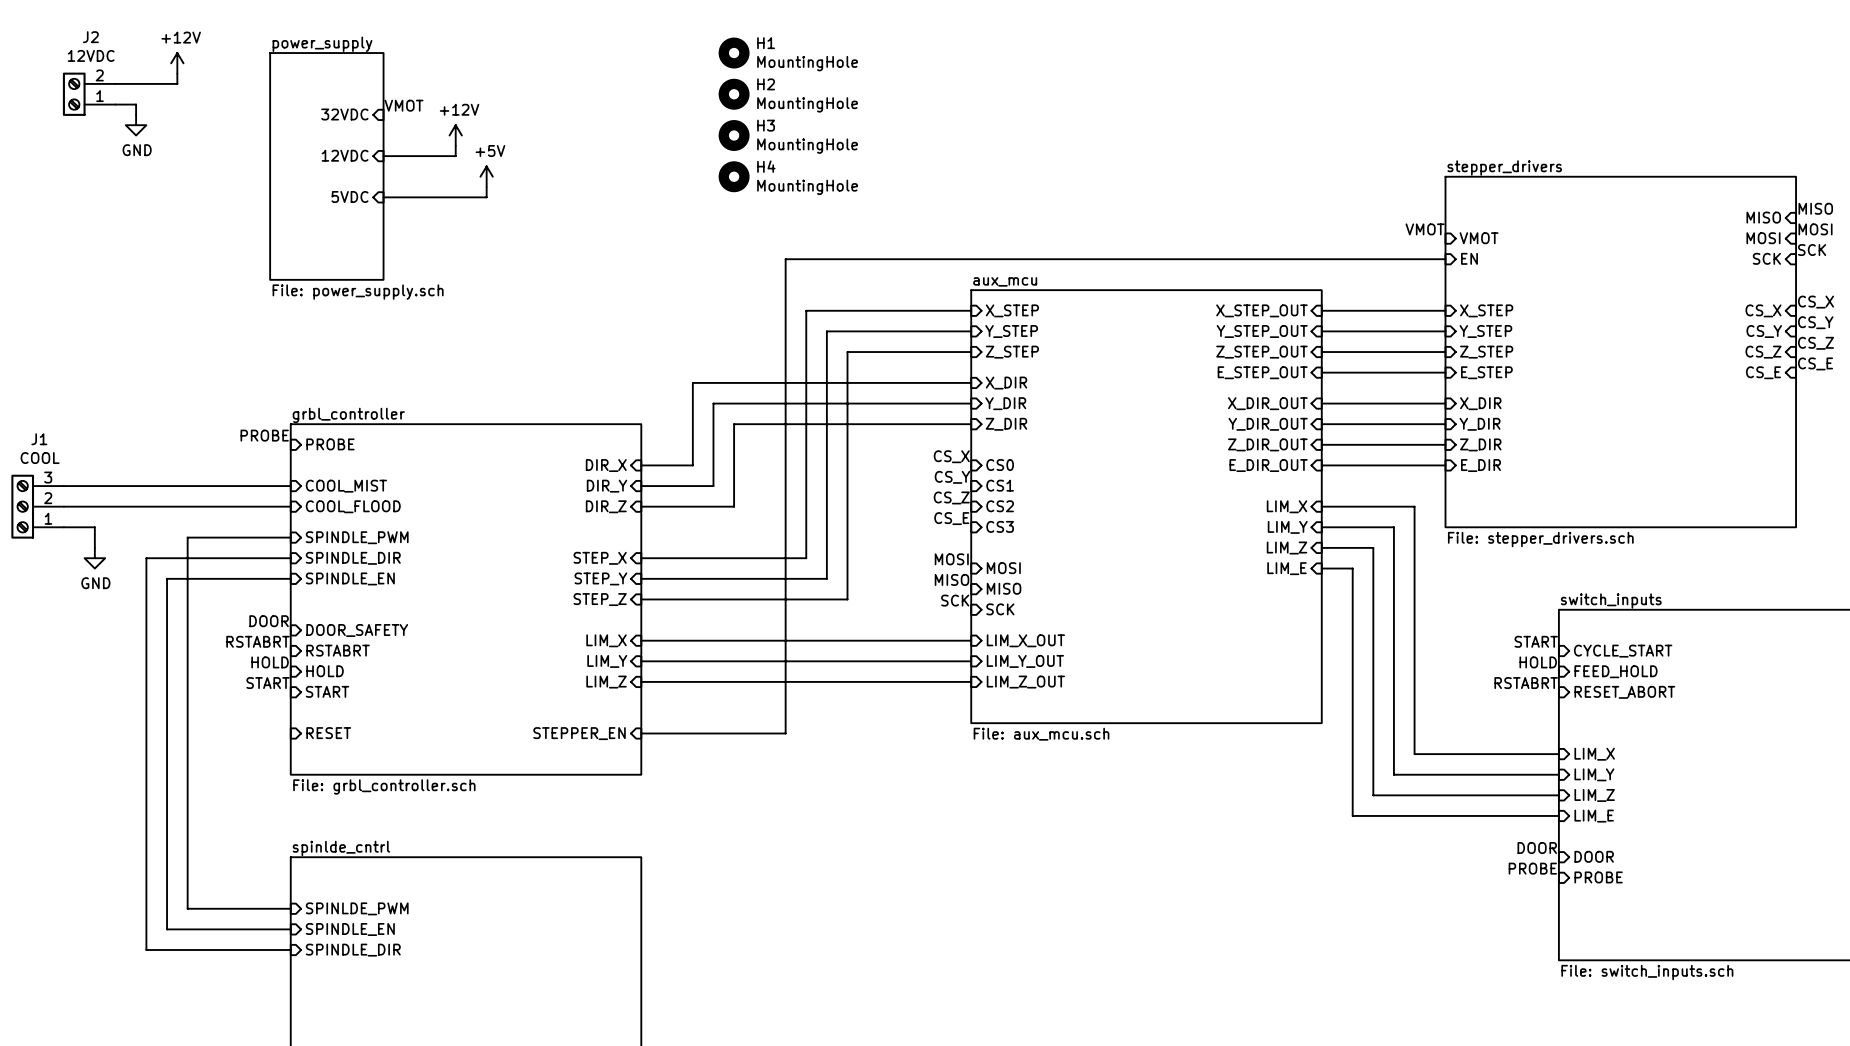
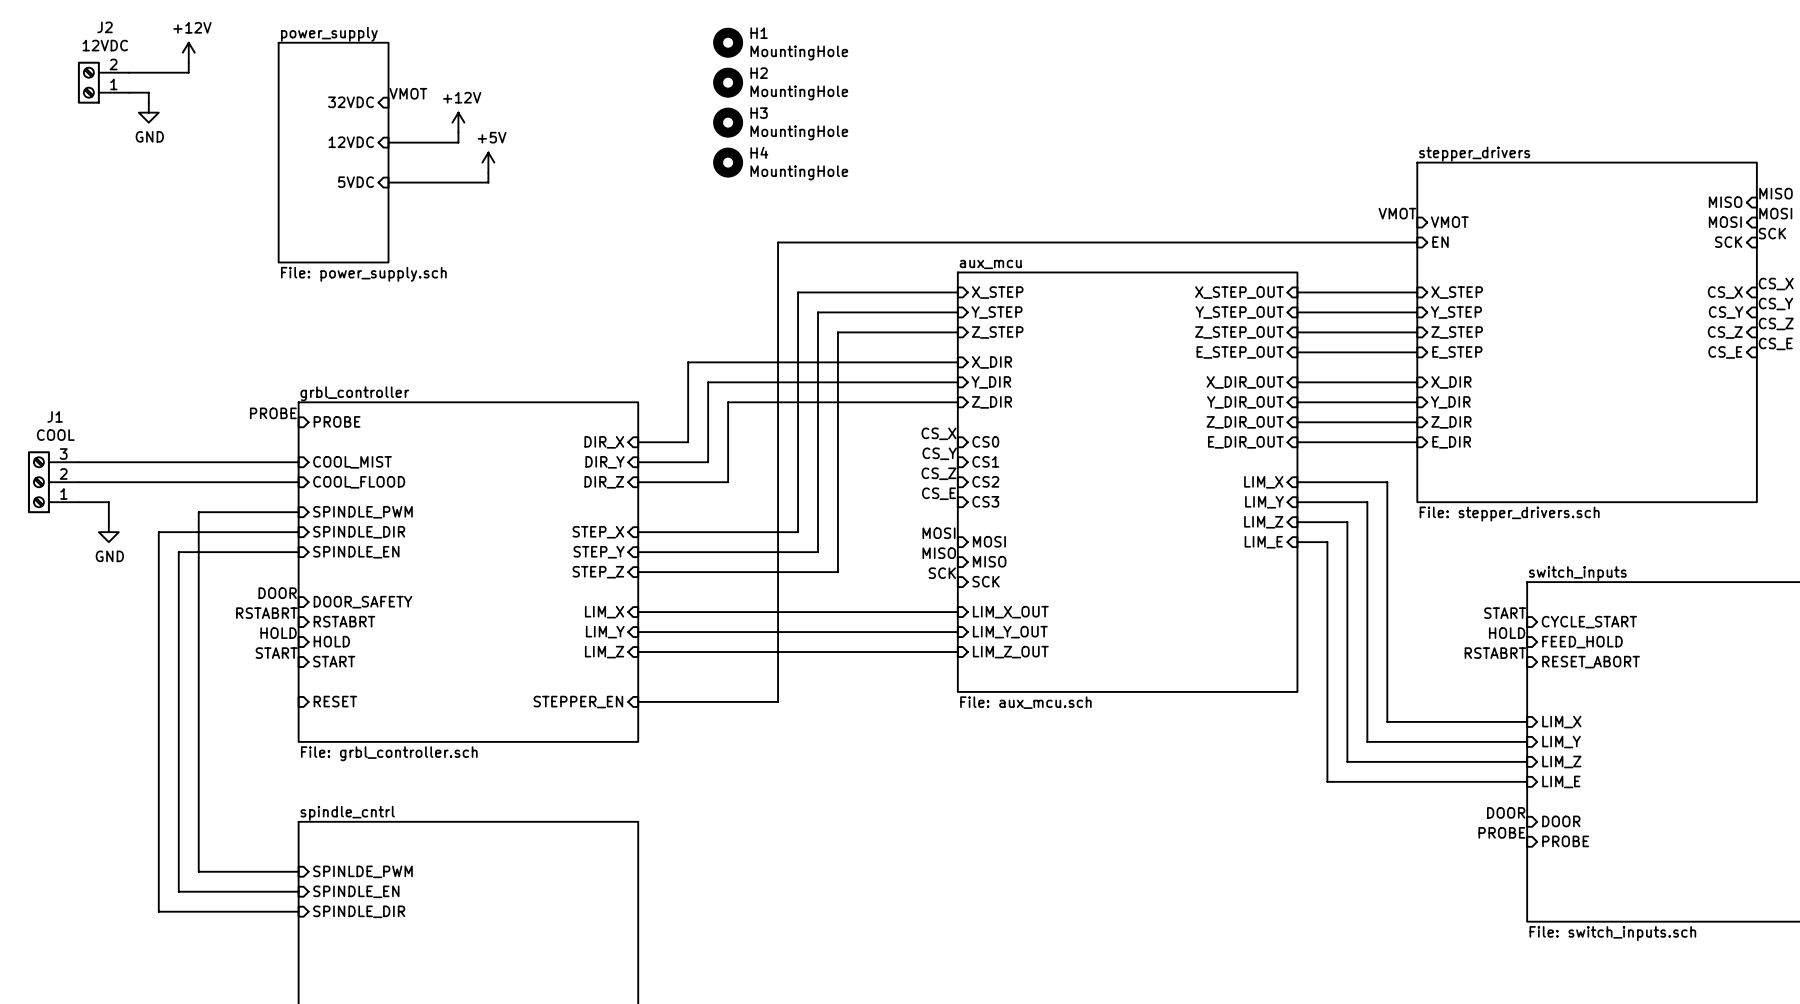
sheet spinlde_cntrl name: spinlde_cntrl (341, 848) -> spindle_cntrl (347, 813)

